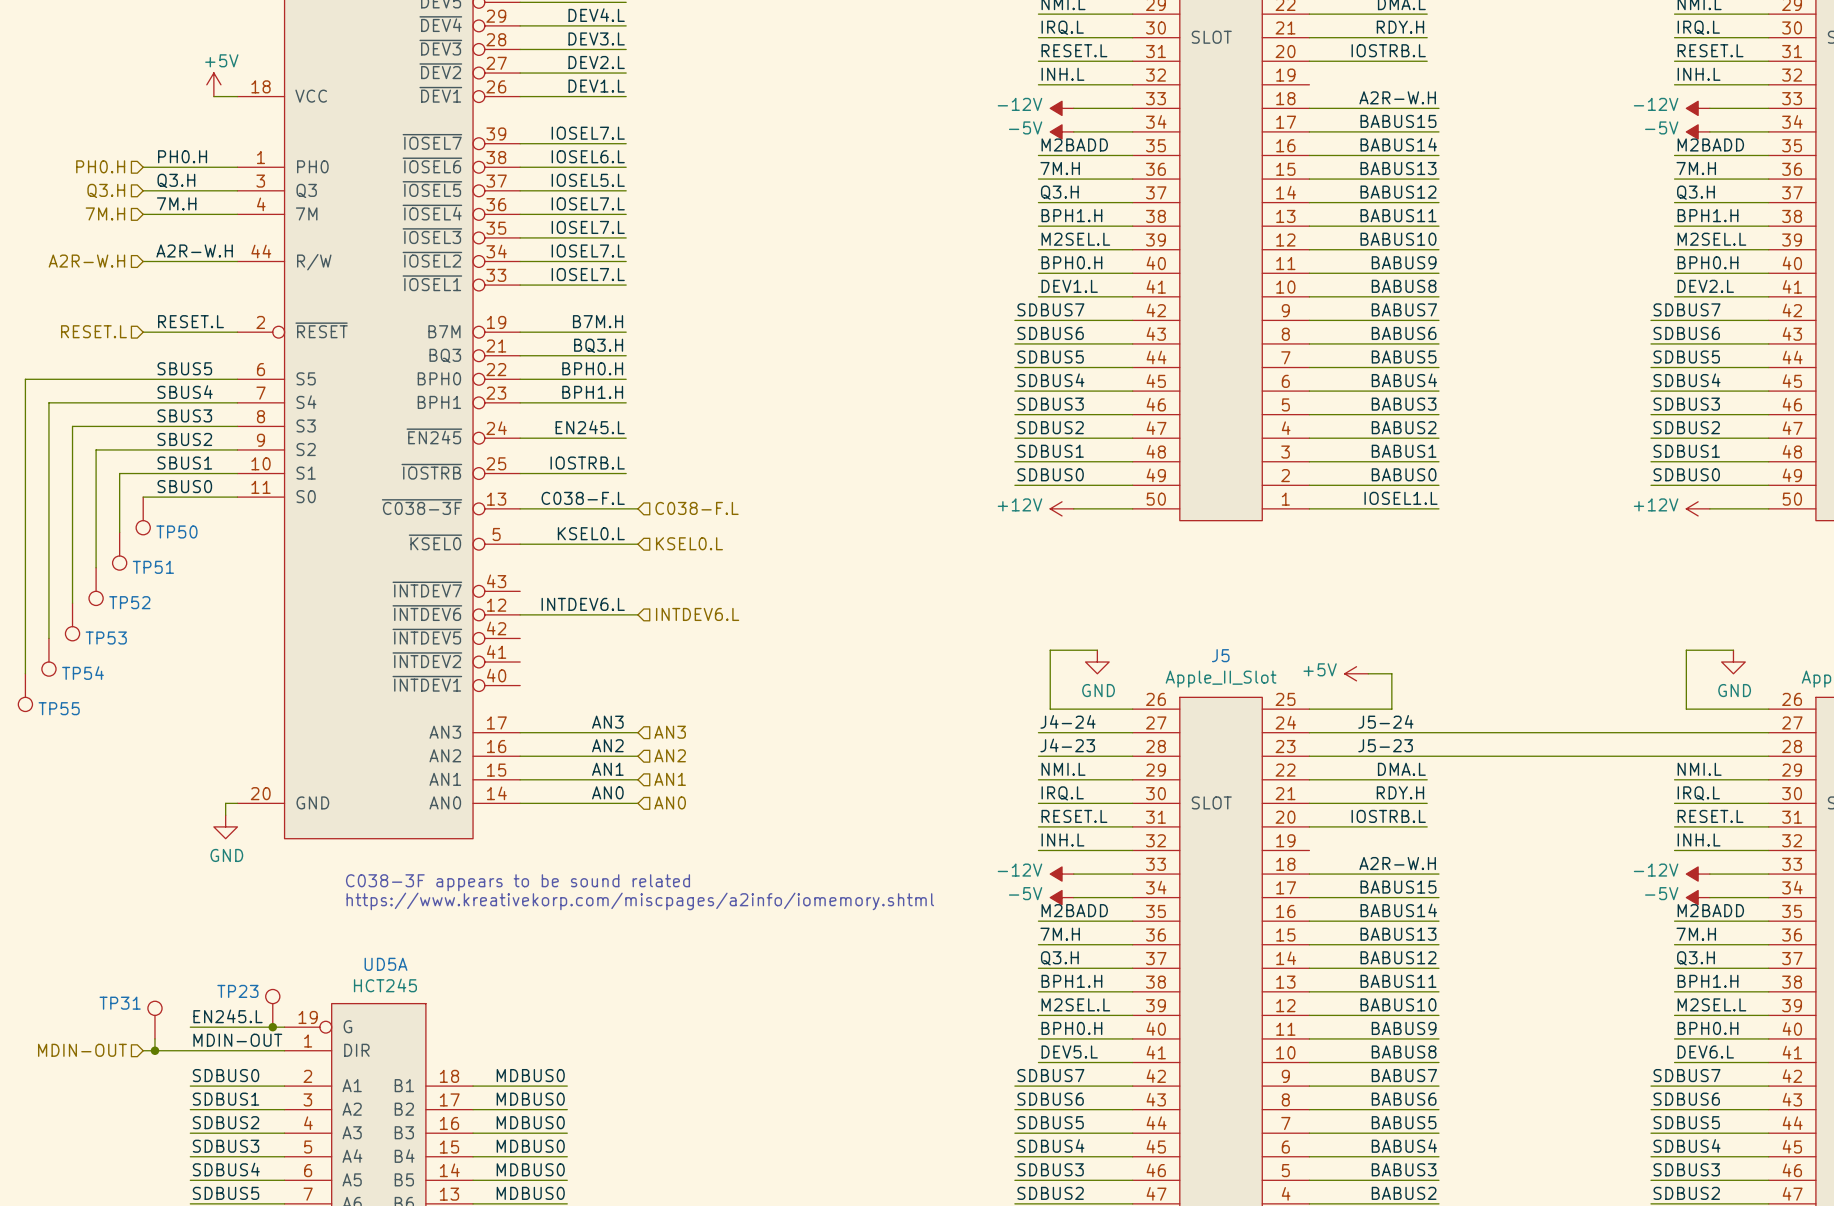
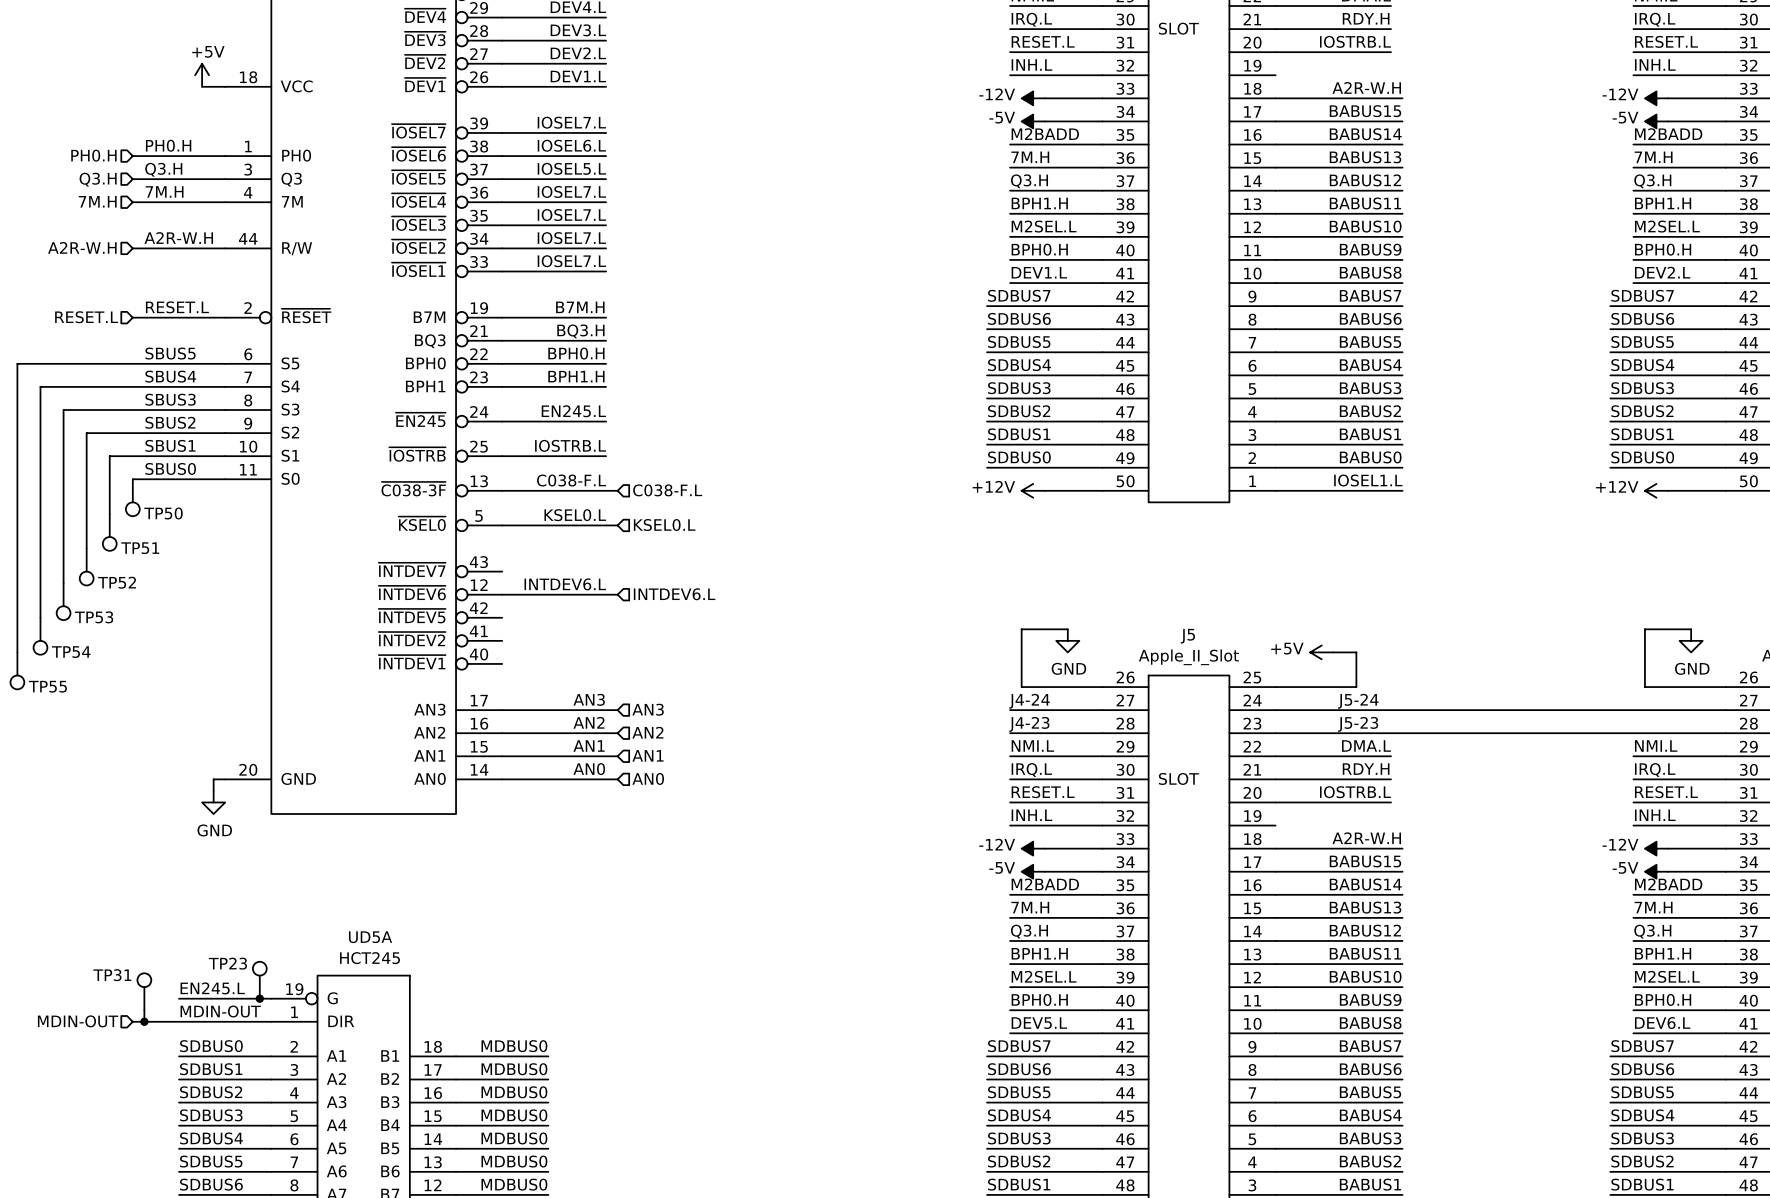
text: C038-3F appears to be sound related (518, 882) -> none
text: https://www.kreativekorp.com/miscpages/a2info/iomemory.shtml (640, 901) -> none

